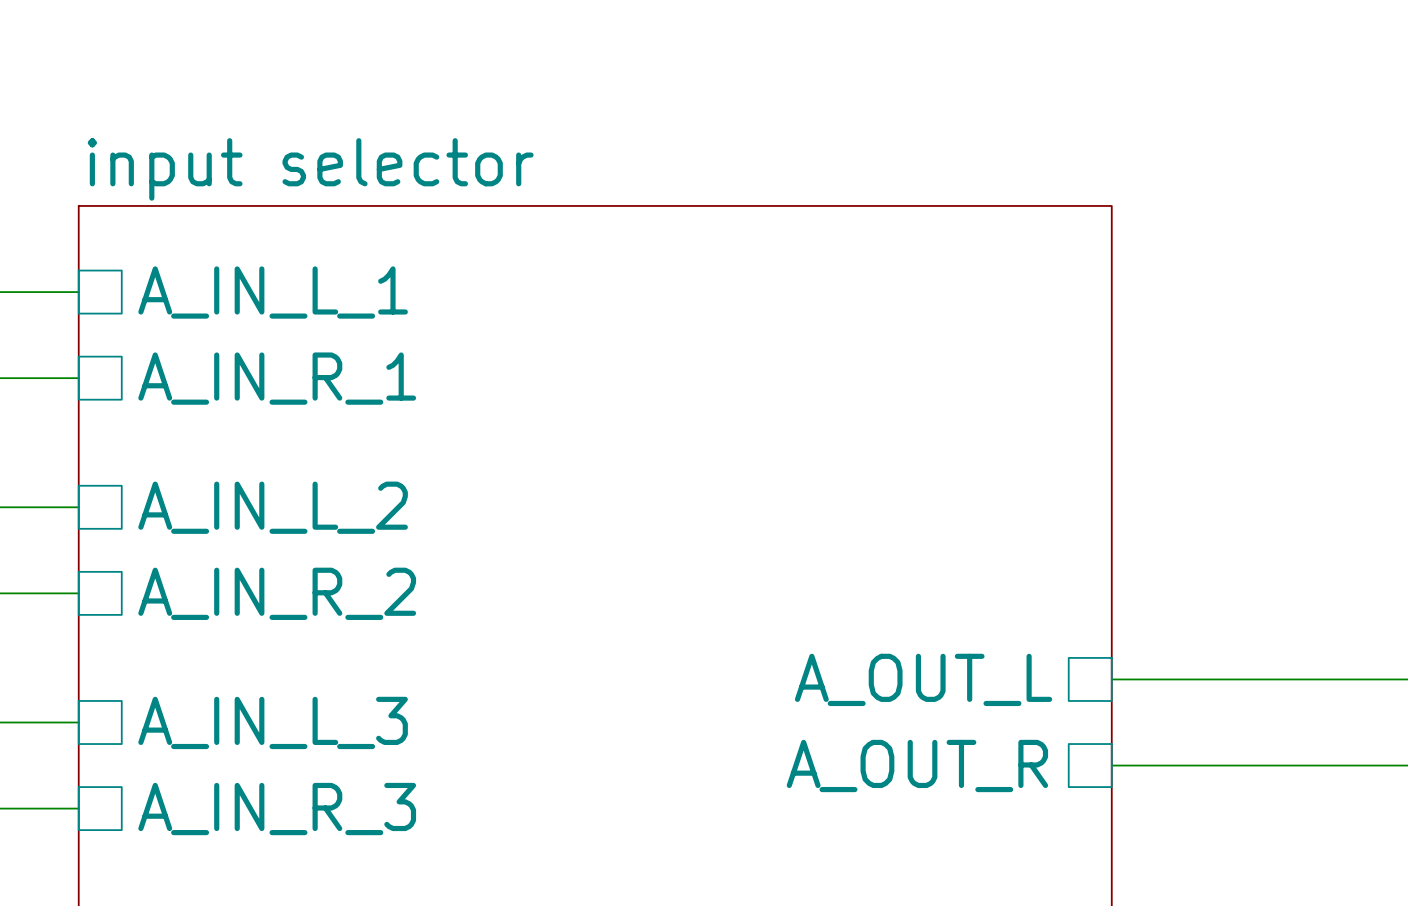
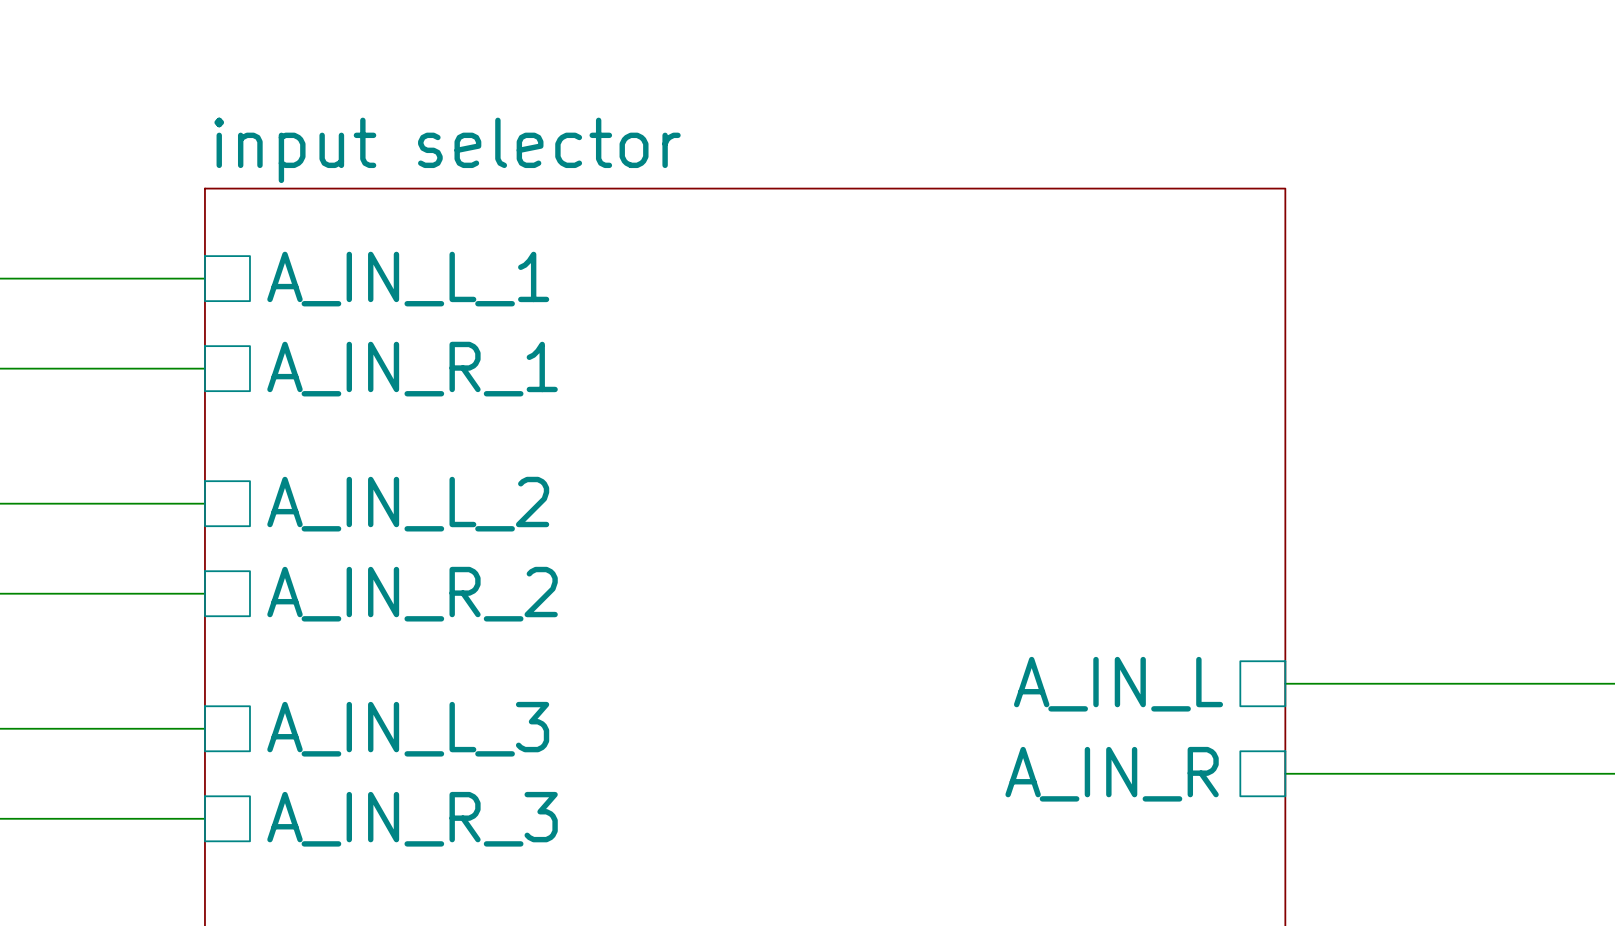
sheet pin: A_OUT_L (923, 679) -> A_IN_L (1118, 684)
sheet pin: A_OUT_R (917, 765) -> A_IN_R (1112, 774)

